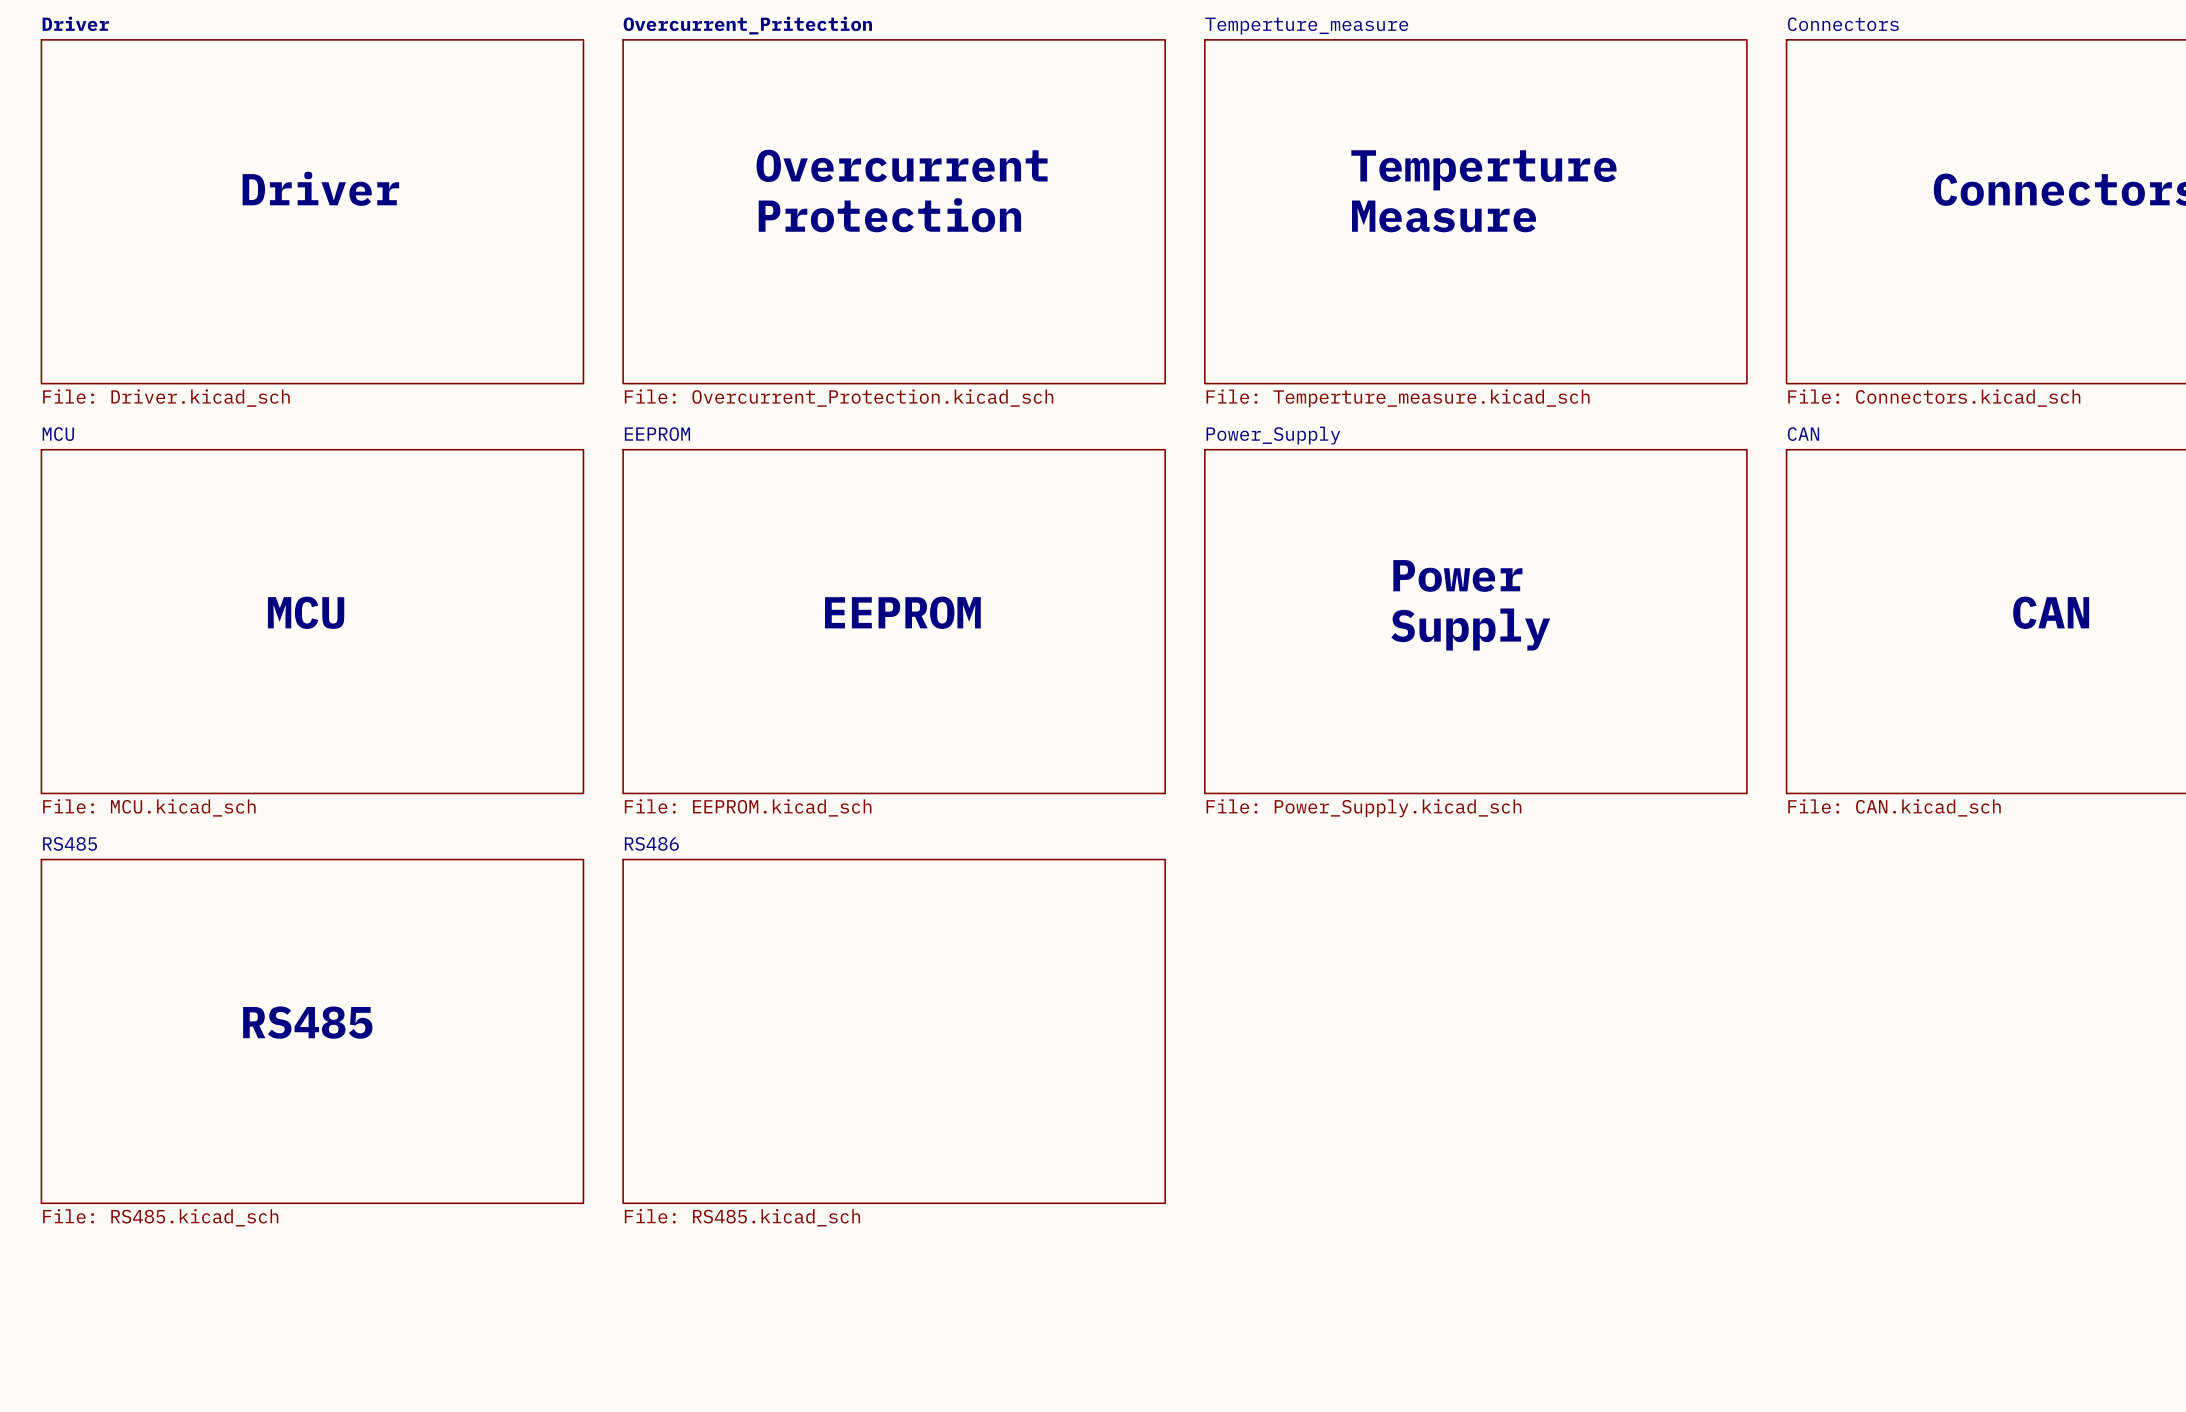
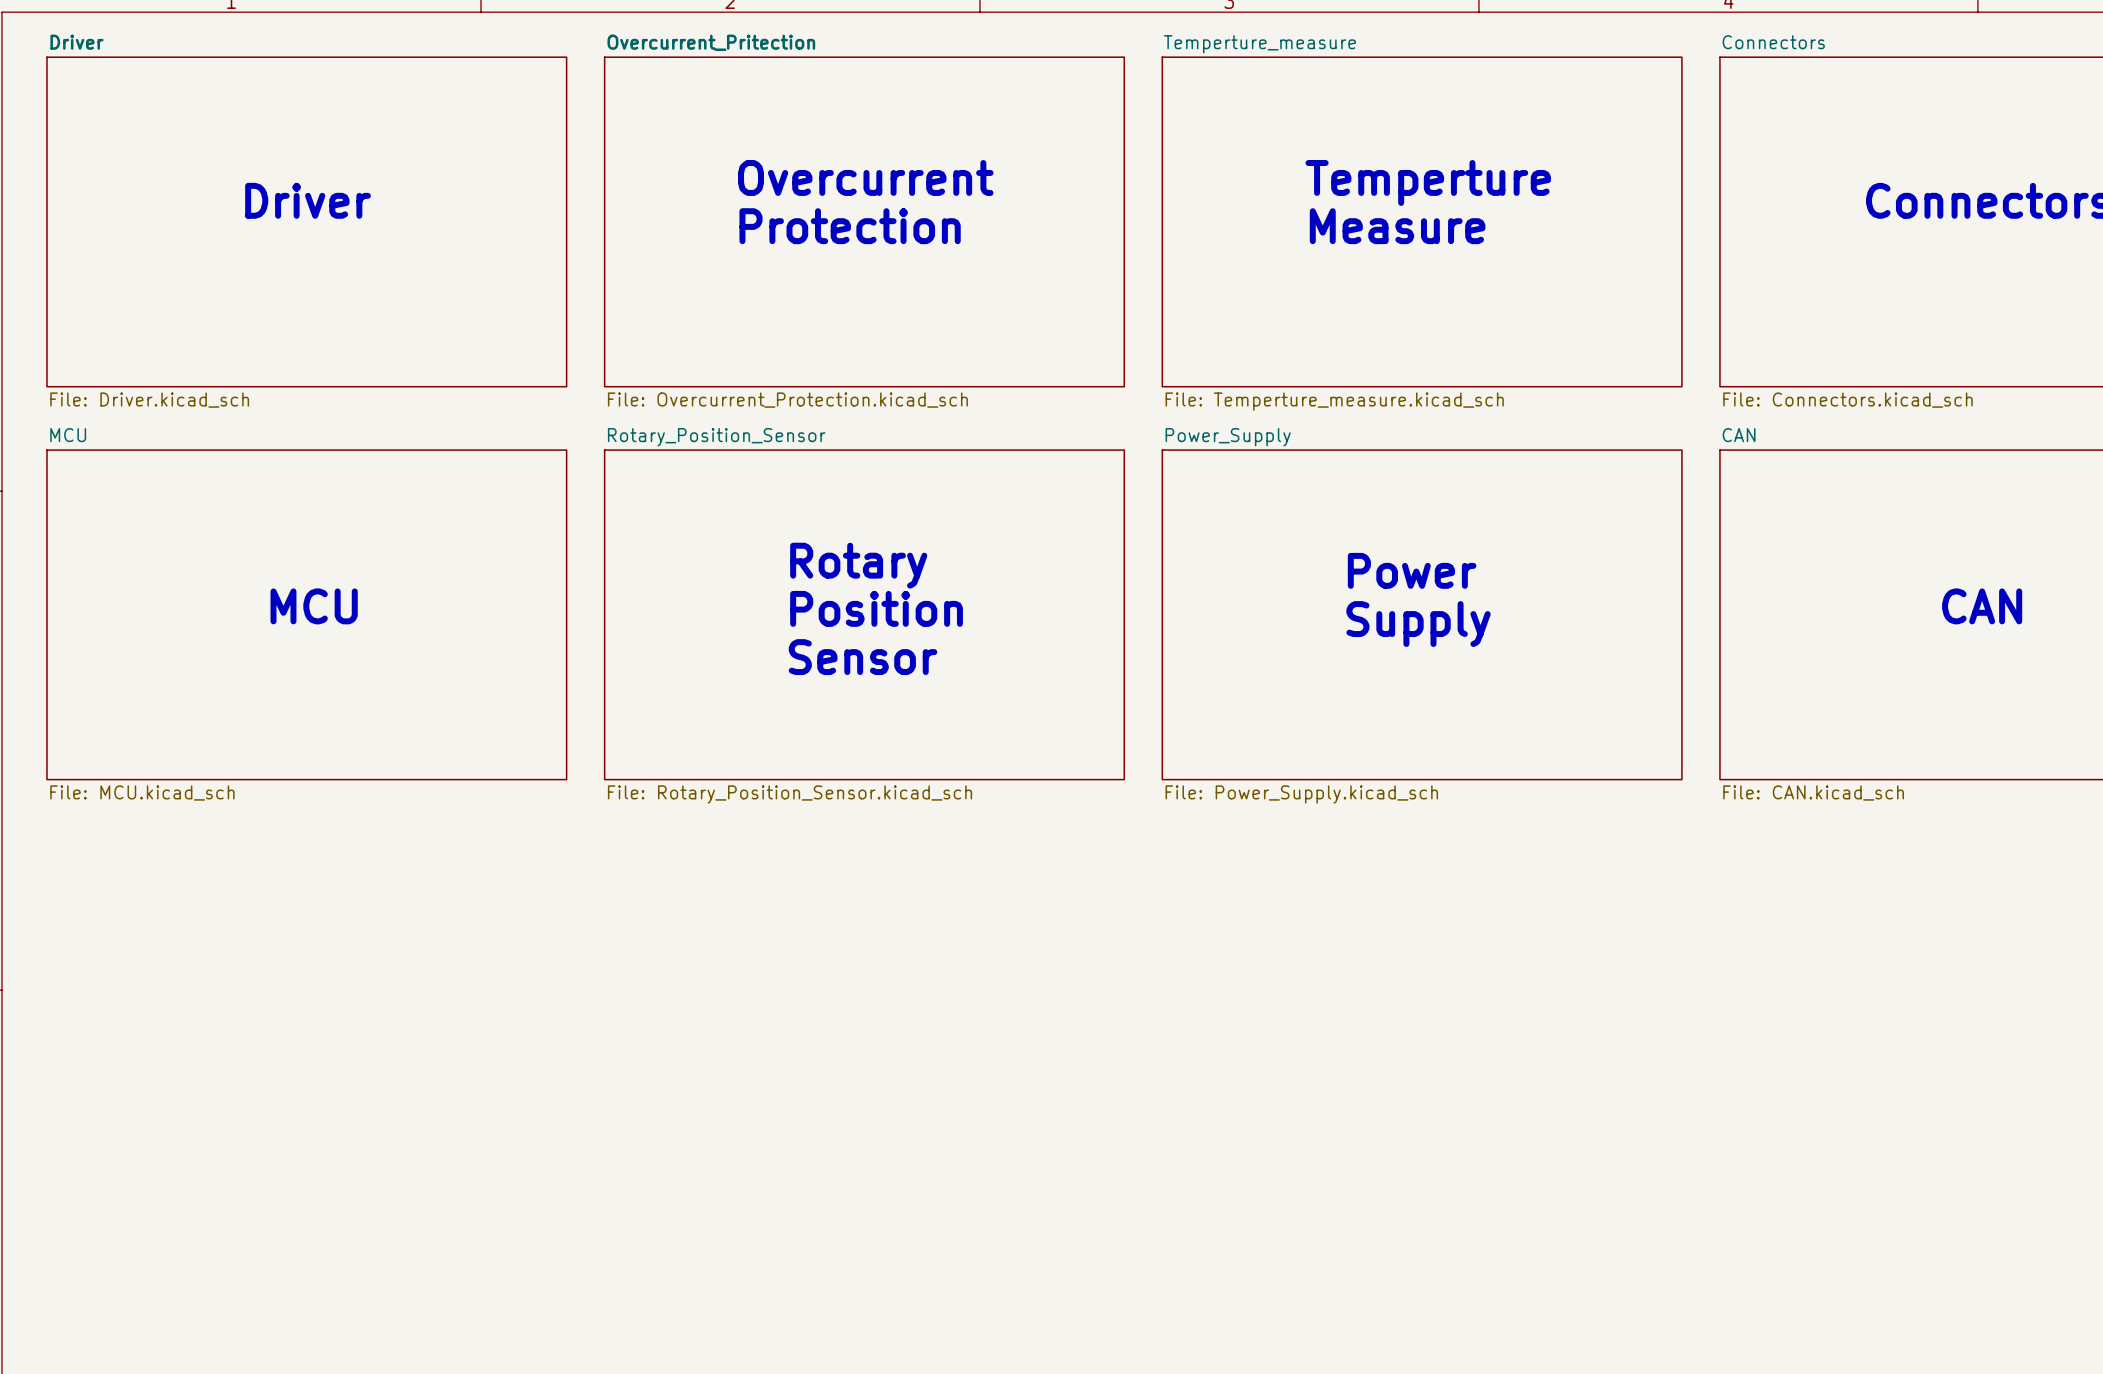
sheet EEPROM name: EEPROM (657, 434) -> Rotary_Position_Sensor (716, 437)
text: none -> Rotary (858, 565)
text: EEPROM (902, 612) -> none
text: none -> Position (876, 608)
text: none -> Sensor (863, 657)
sheet EEPROM value: File: EEPROM.kicad_sch (748, 807) -> File: Rotary_Position_Sensor.kicad_sch (790, 794)
text: RS485 (307, 1022) -> none
sheet RS485: File: RS485.kicad_sch (312, 1031) -> none
sheet RS486: File: RS485.kicad_sch (894, 1031) -> none

